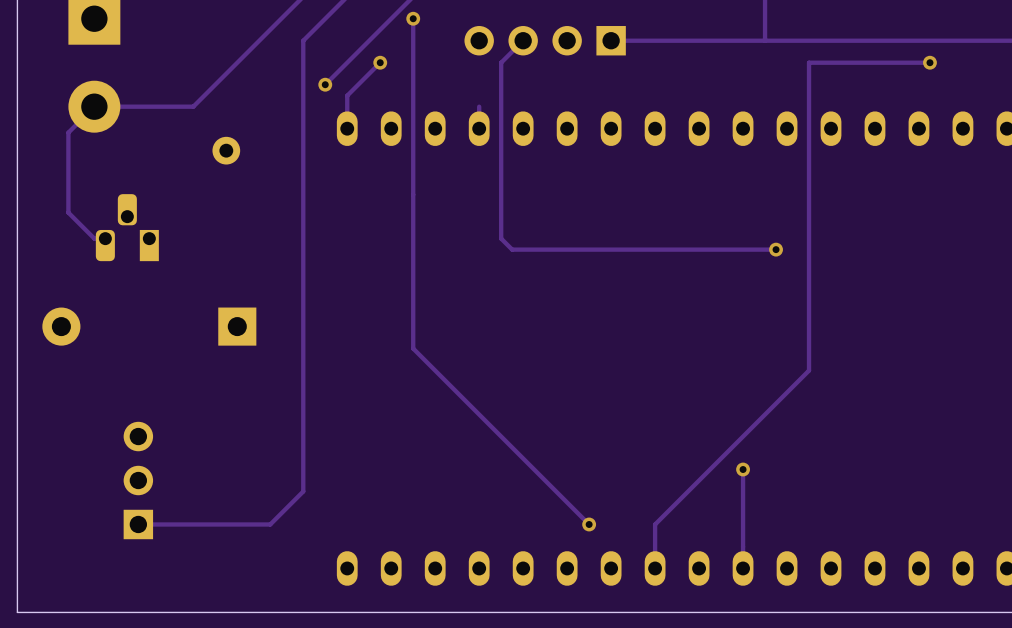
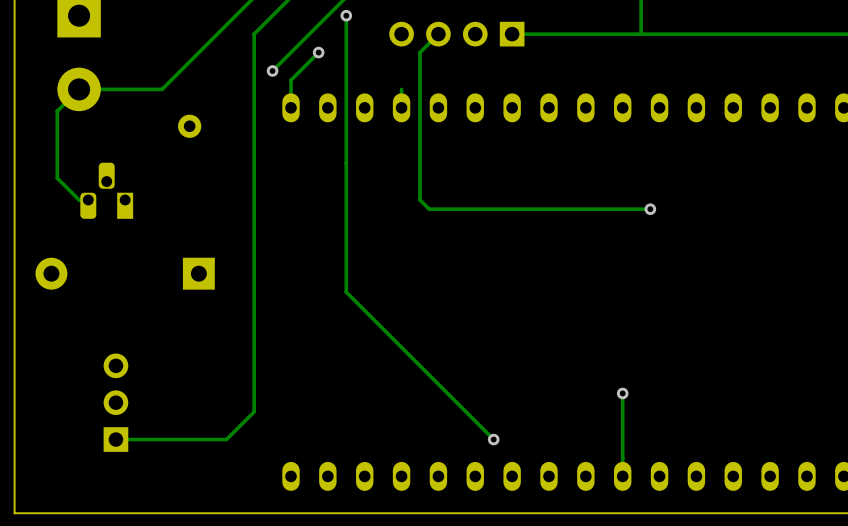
track: (929, 62) (809, 62) (809, 370) (655, 524) (655, 568) -> none
via: (929, 62) -> none

